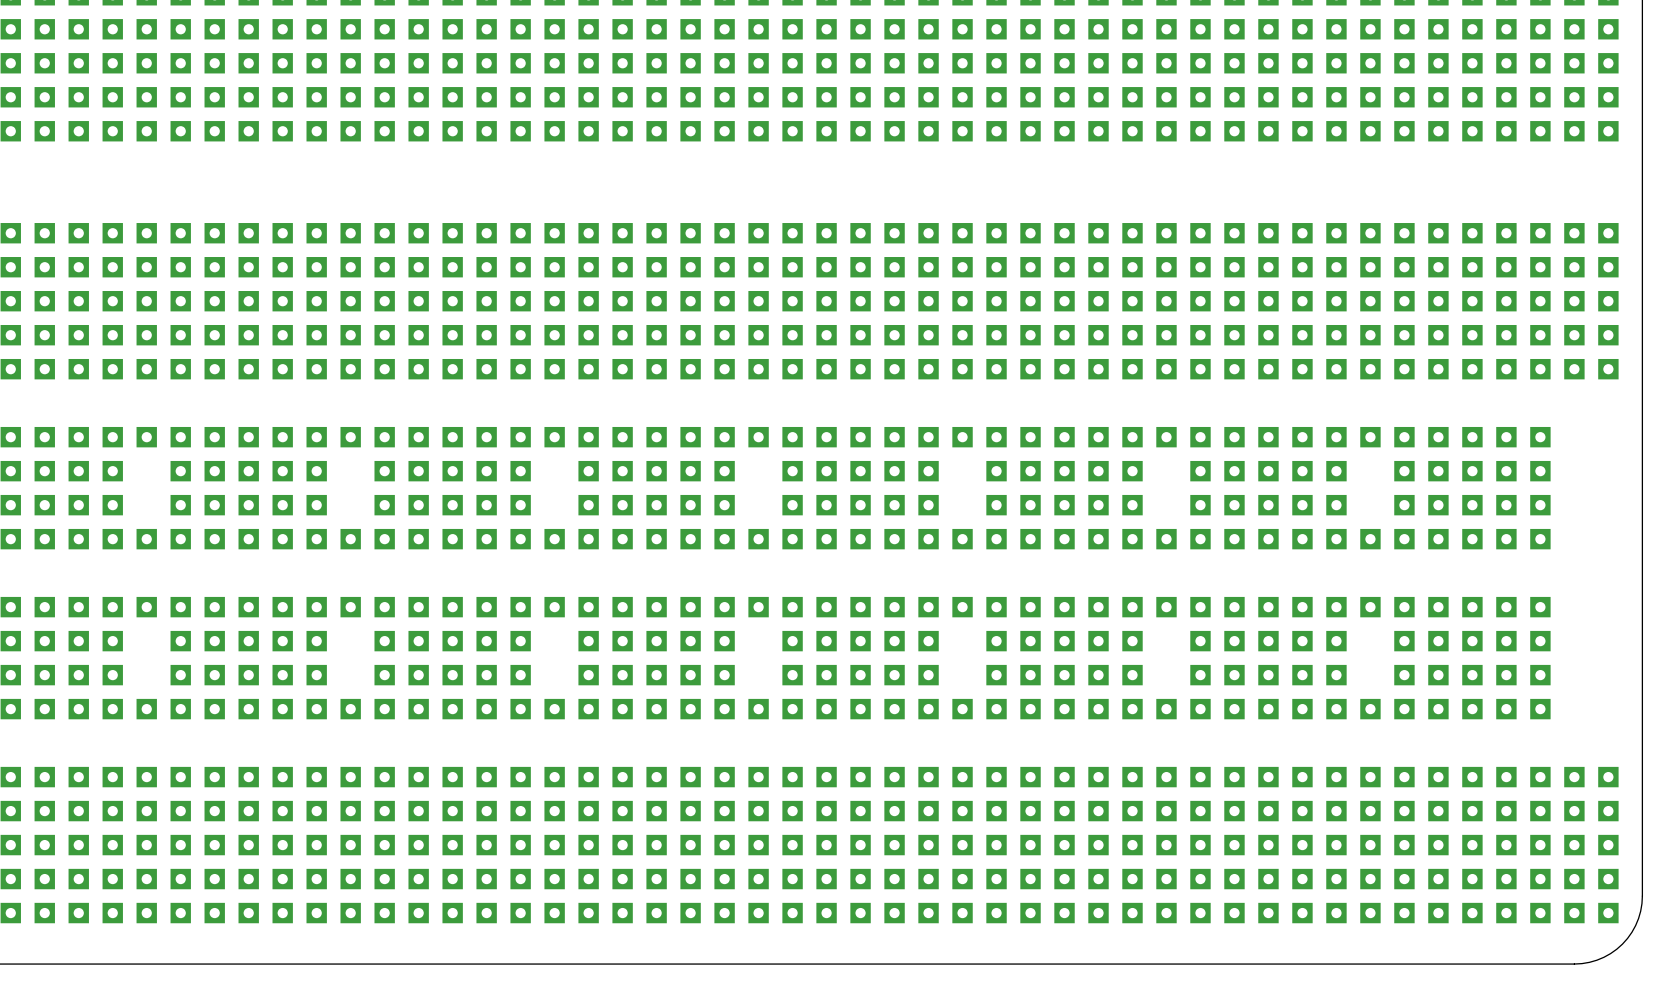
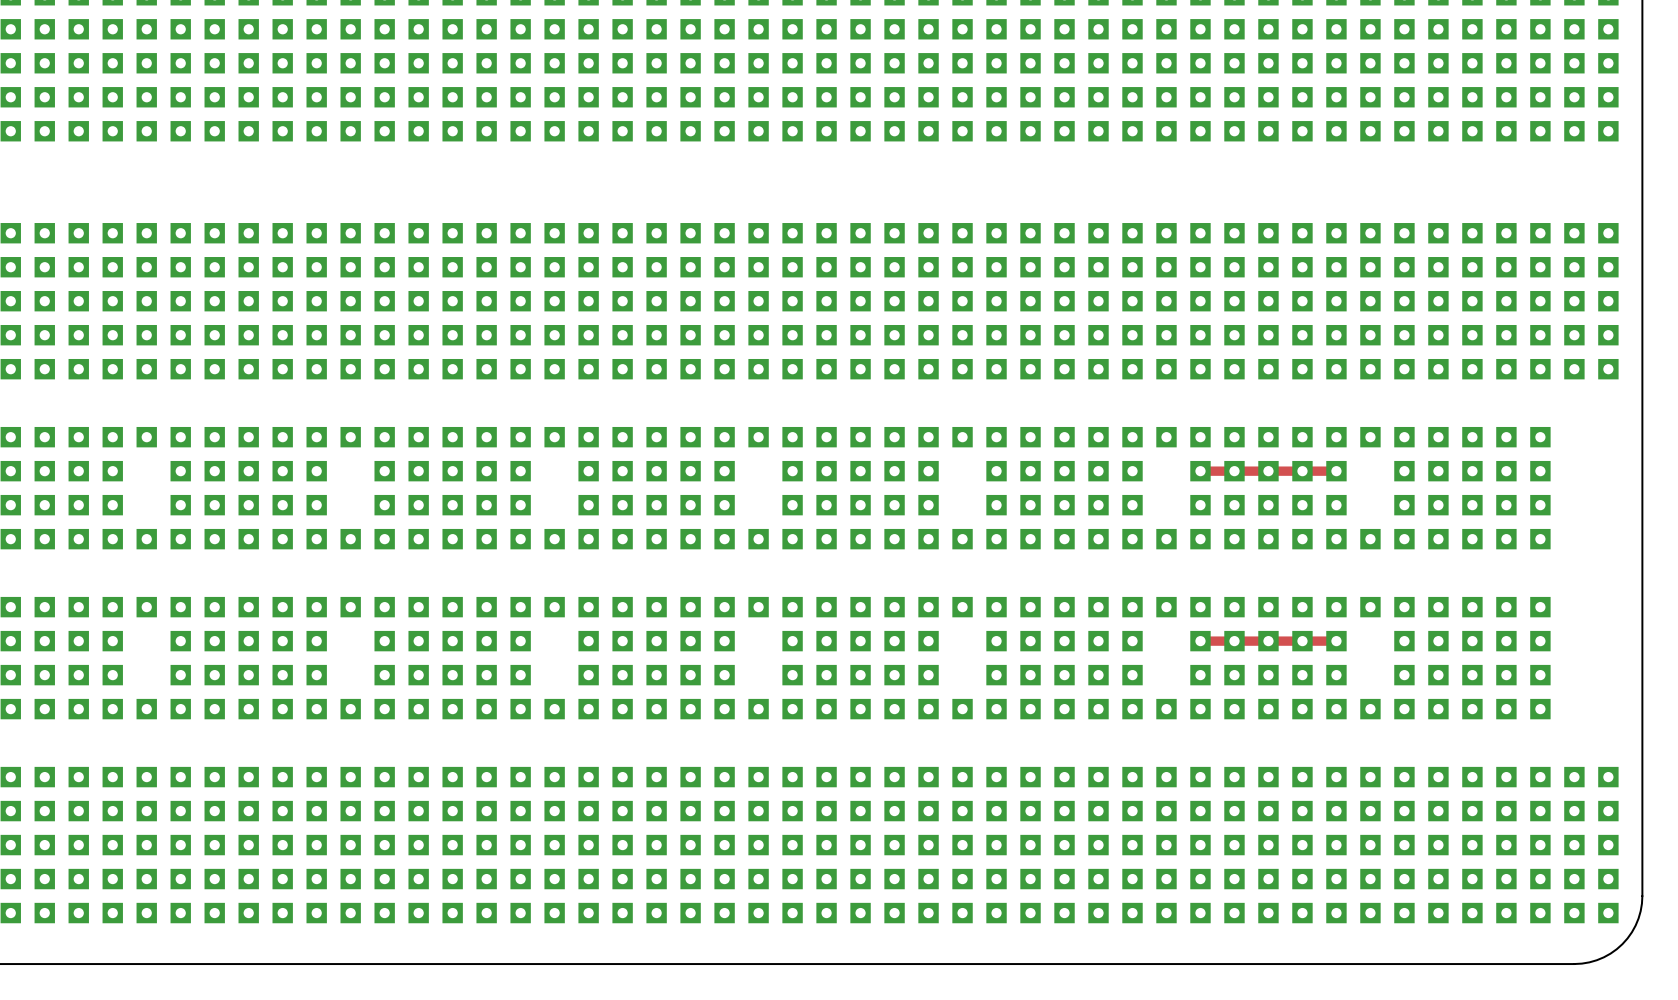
track: none -> (1200, 471) (1336, 471)
track: none -> (1200, 641) (1336, 641)

